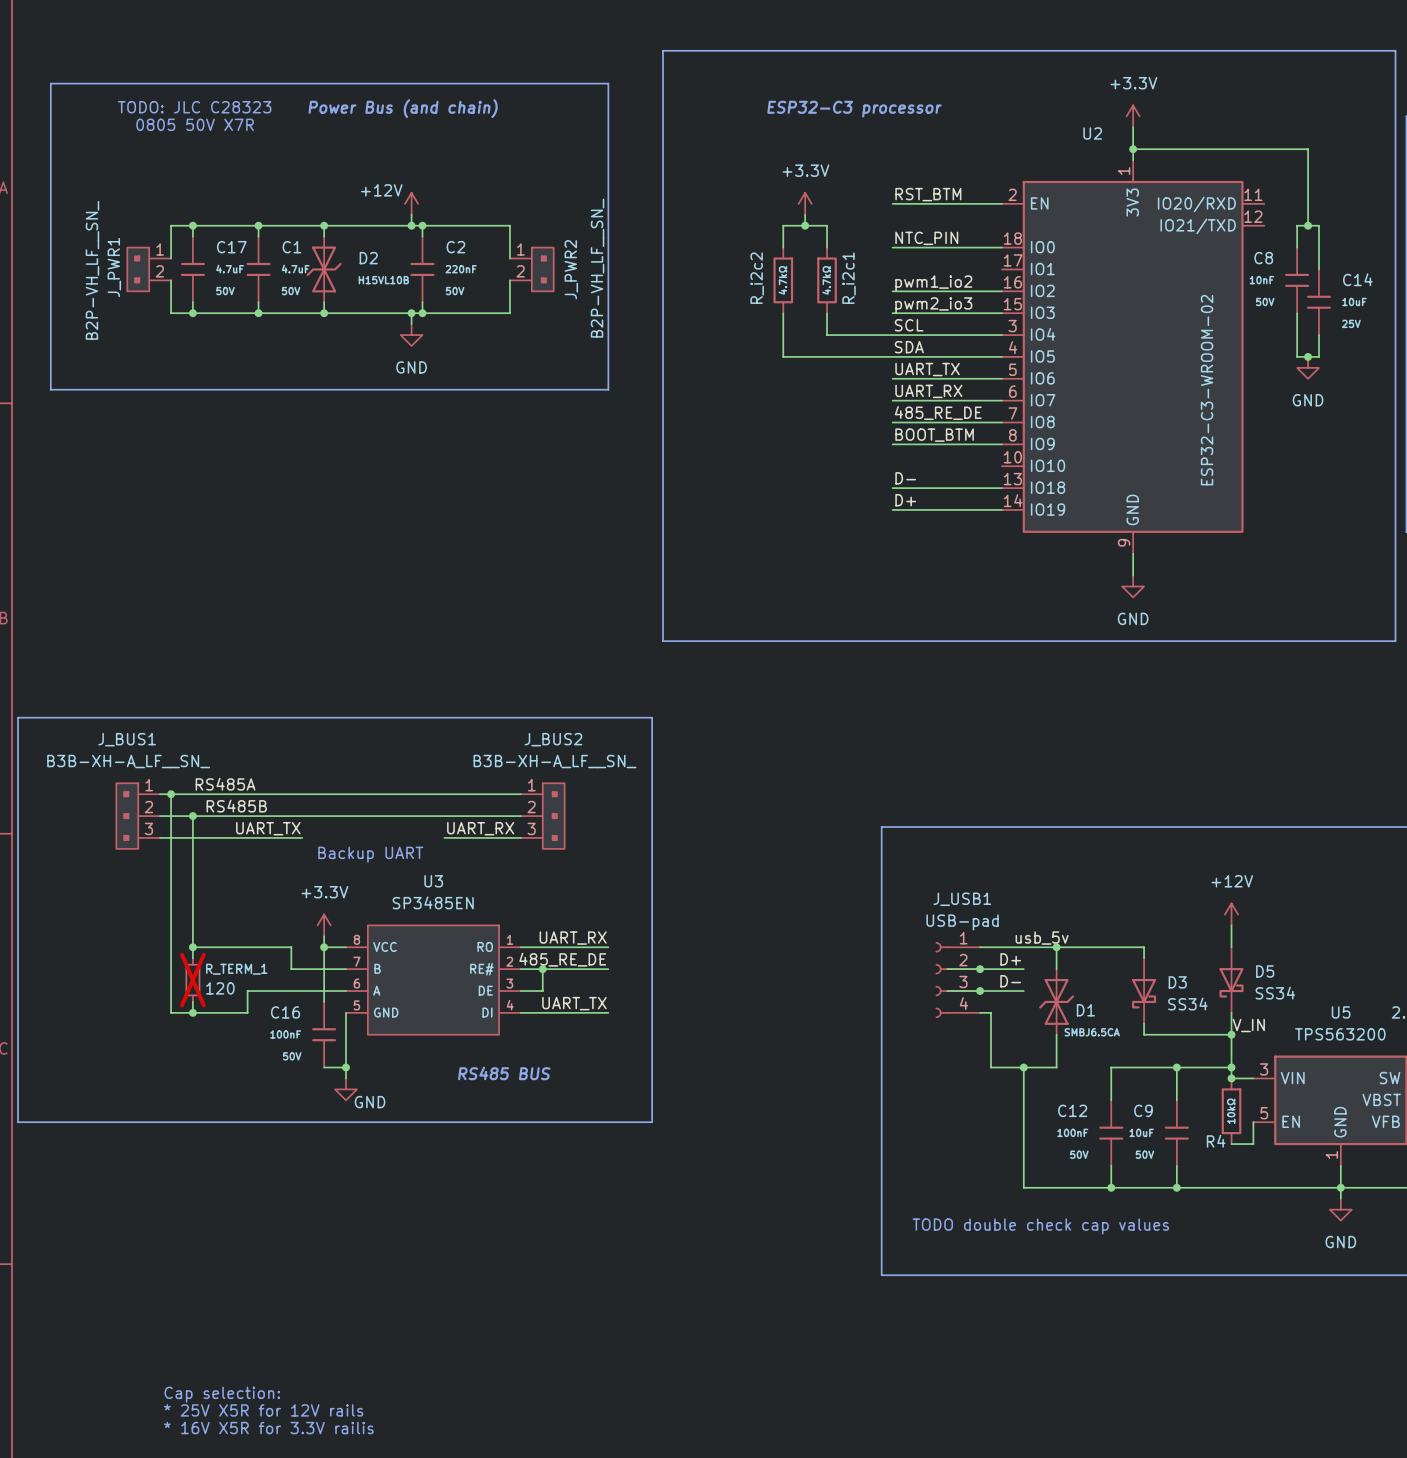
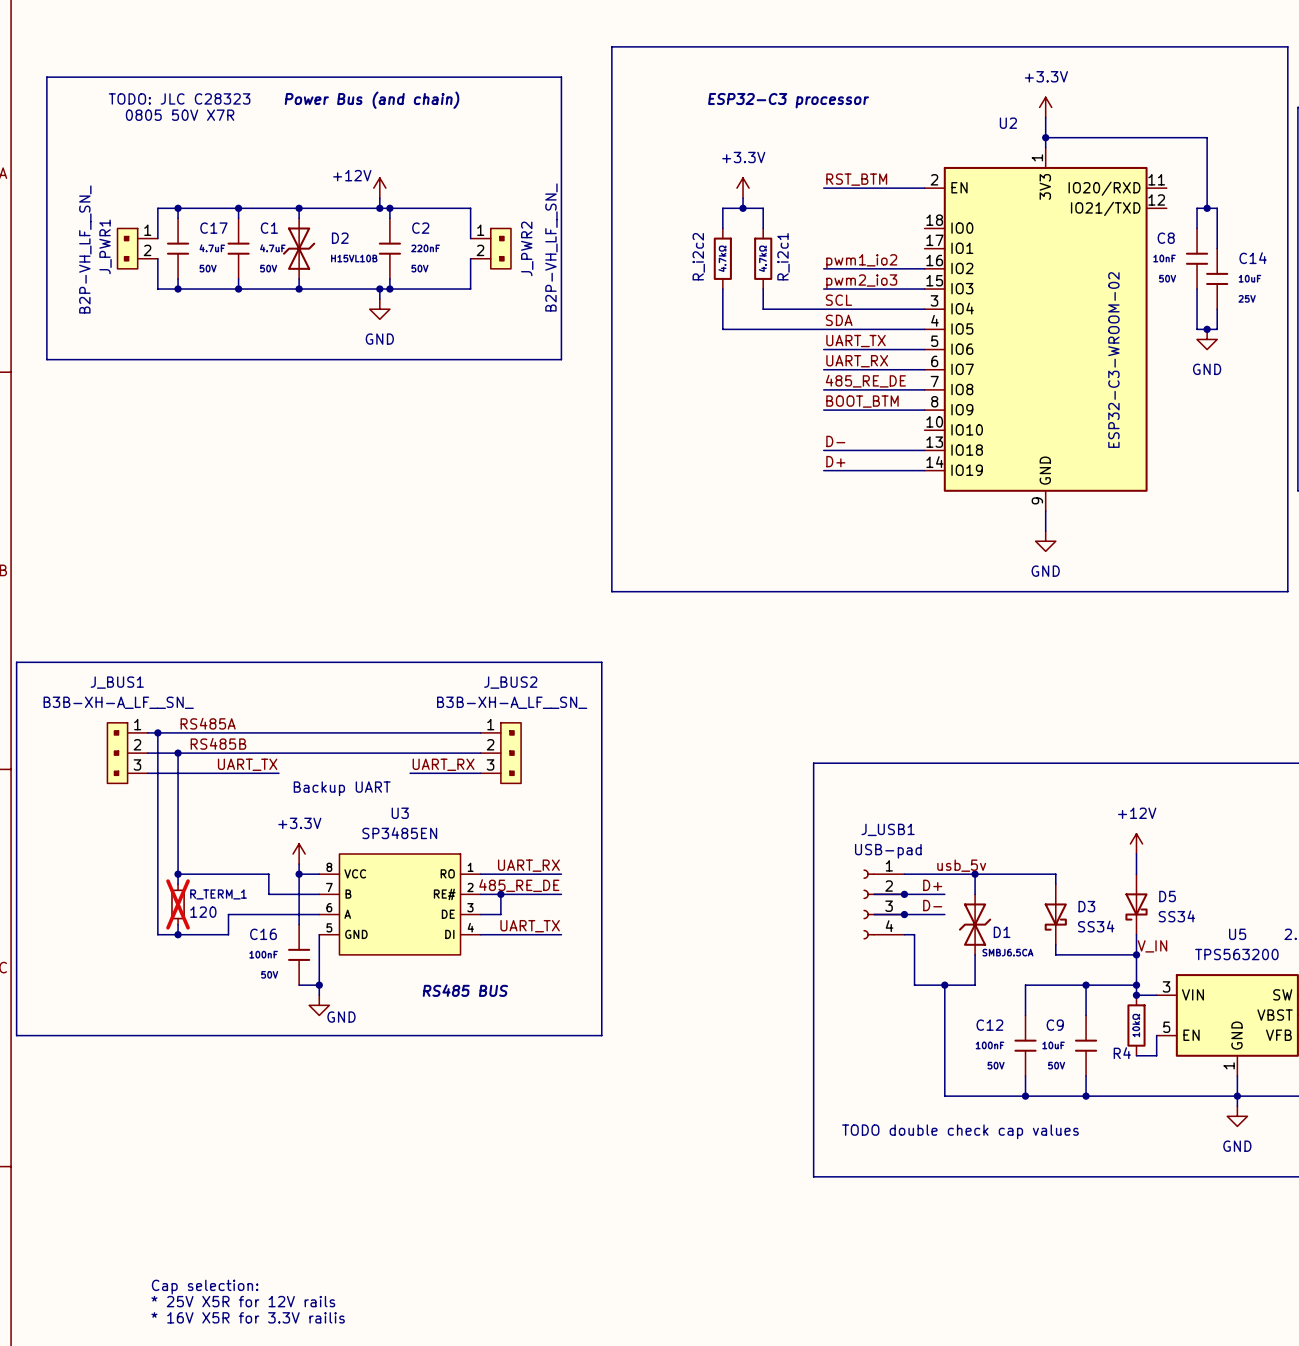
label: NTC_PIN (926, 238) -> none
wire: (892, 247) (1001, 247) -> none

